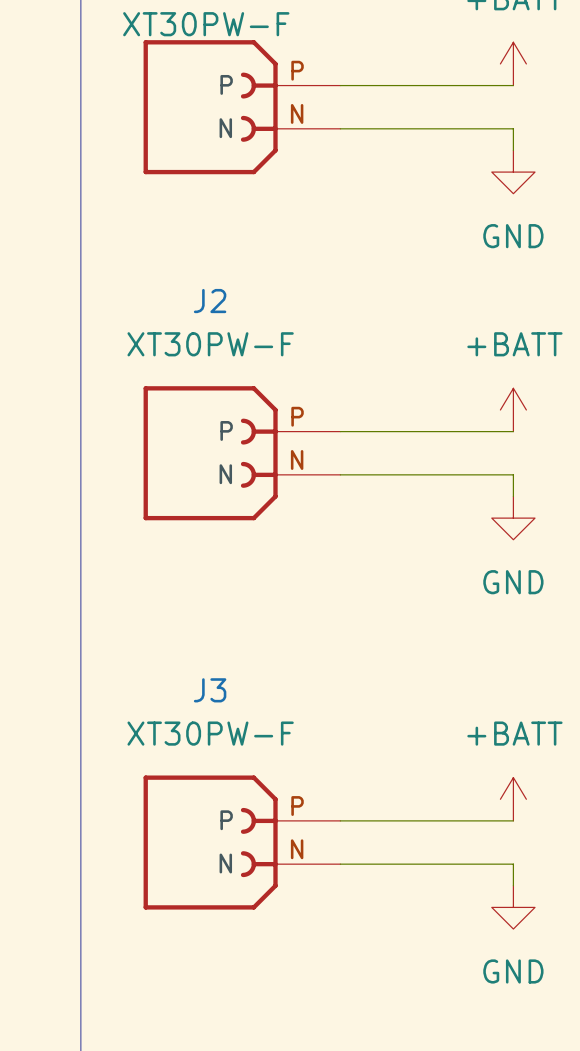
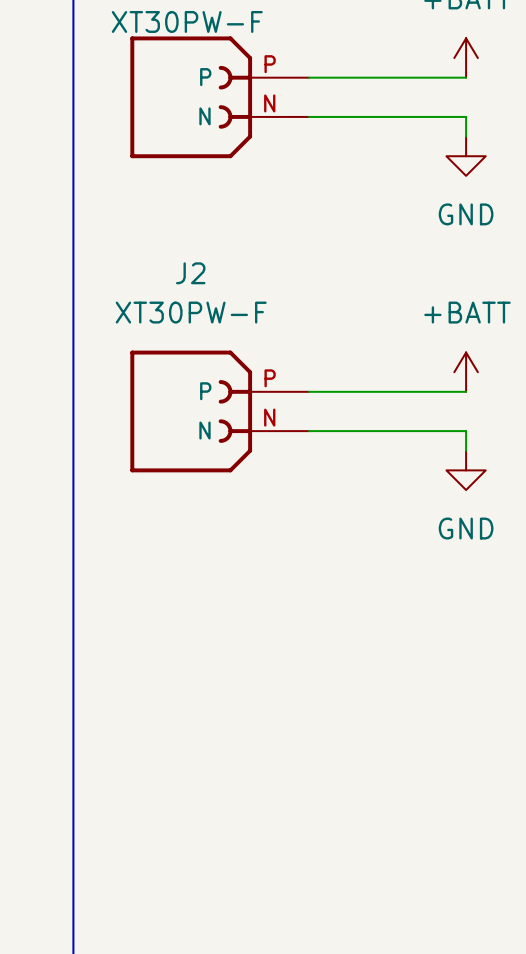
power symbol: +BATT (513, 799) -> none
wire: (340, 820) (513, 820) -> none
J3: XT30PW-F (241, 842) -> none
wire: (340, 864) (513, 864) (513, 885) -> none
power symbol: GND (513, 907) -> none

